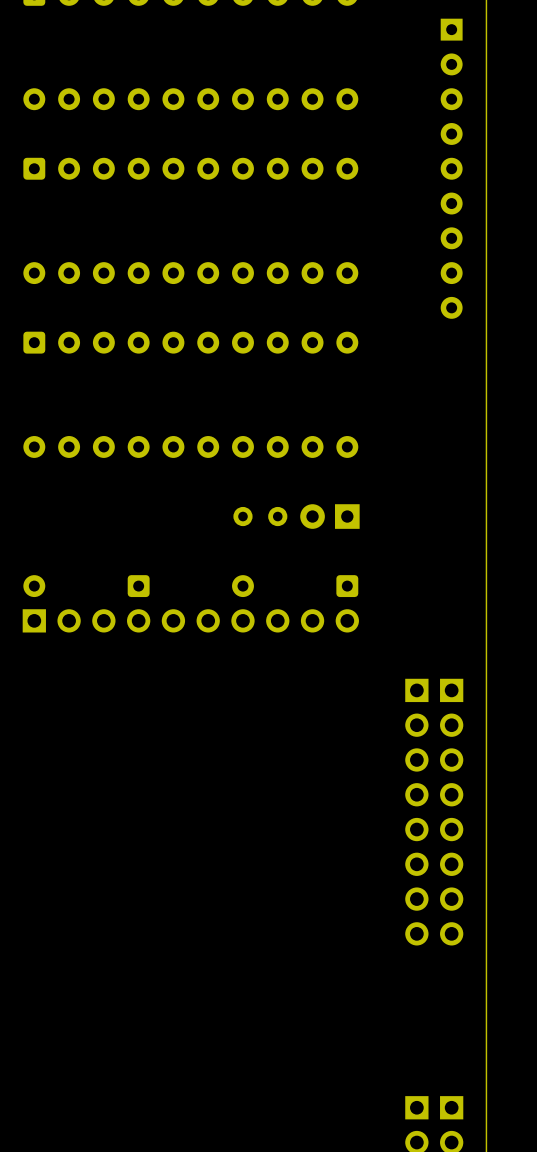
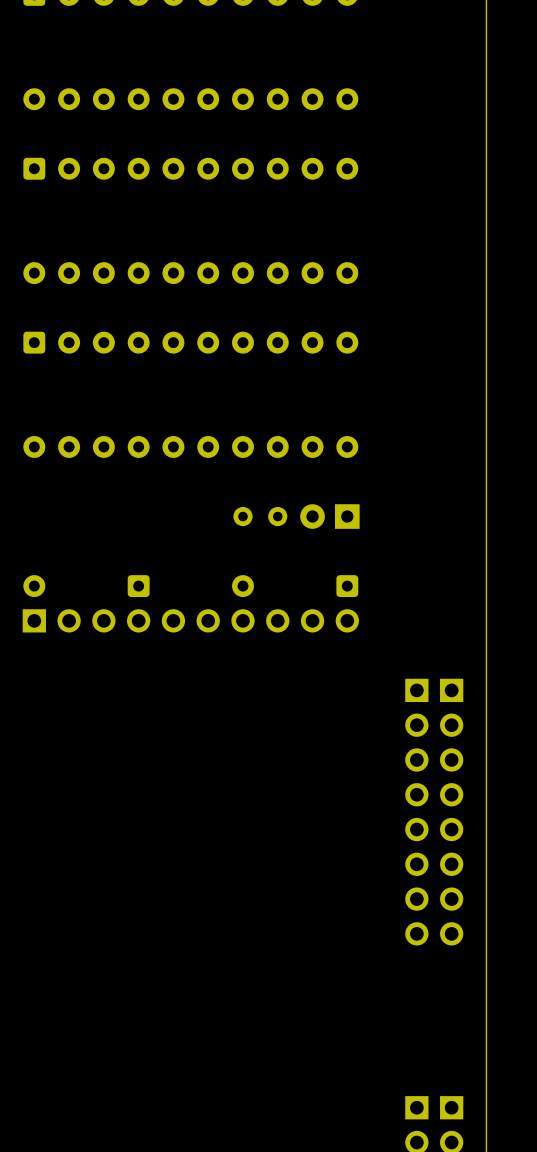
part: (451, 168) -> none

